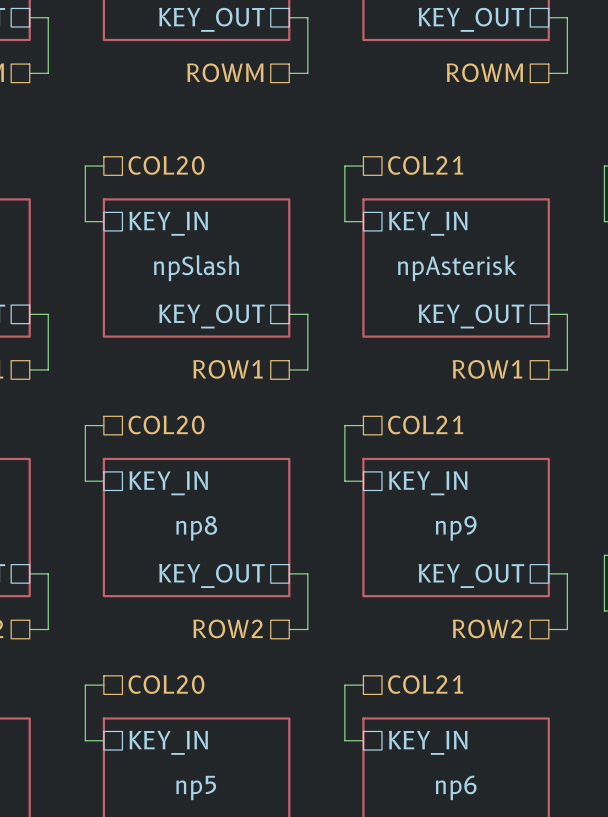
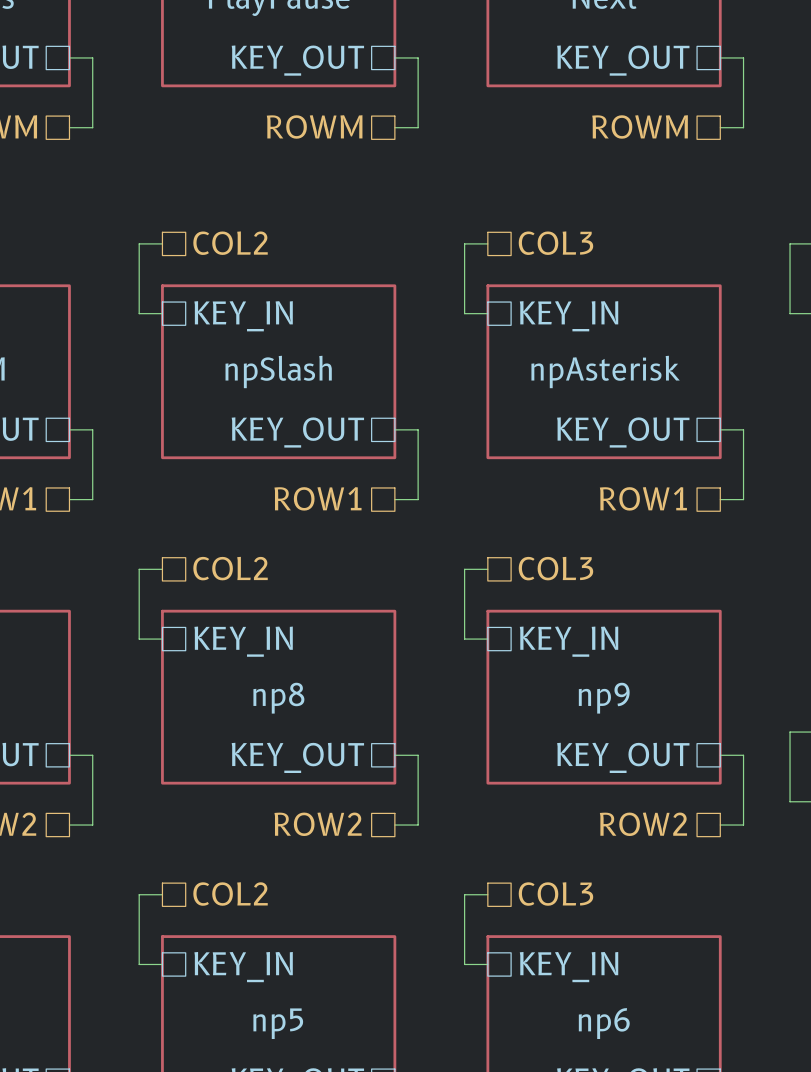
hierarchical label: COL20 (166, 165) -> COL2 (230, 243)
hierarchical label: COL21 (425, 165) -> COL3 (555, 243)
hierarchical label: COL20 (166, 424) -> COL2 (230, 568)
hierarchical label: COL21 (425, 424) -> COL3 (555, 568)
hierarchical label: COL20 (166, 684) -> COL2 (230, 894)
hierarchical label: COL21 (425, 684) -> COL3 (555, 894)

